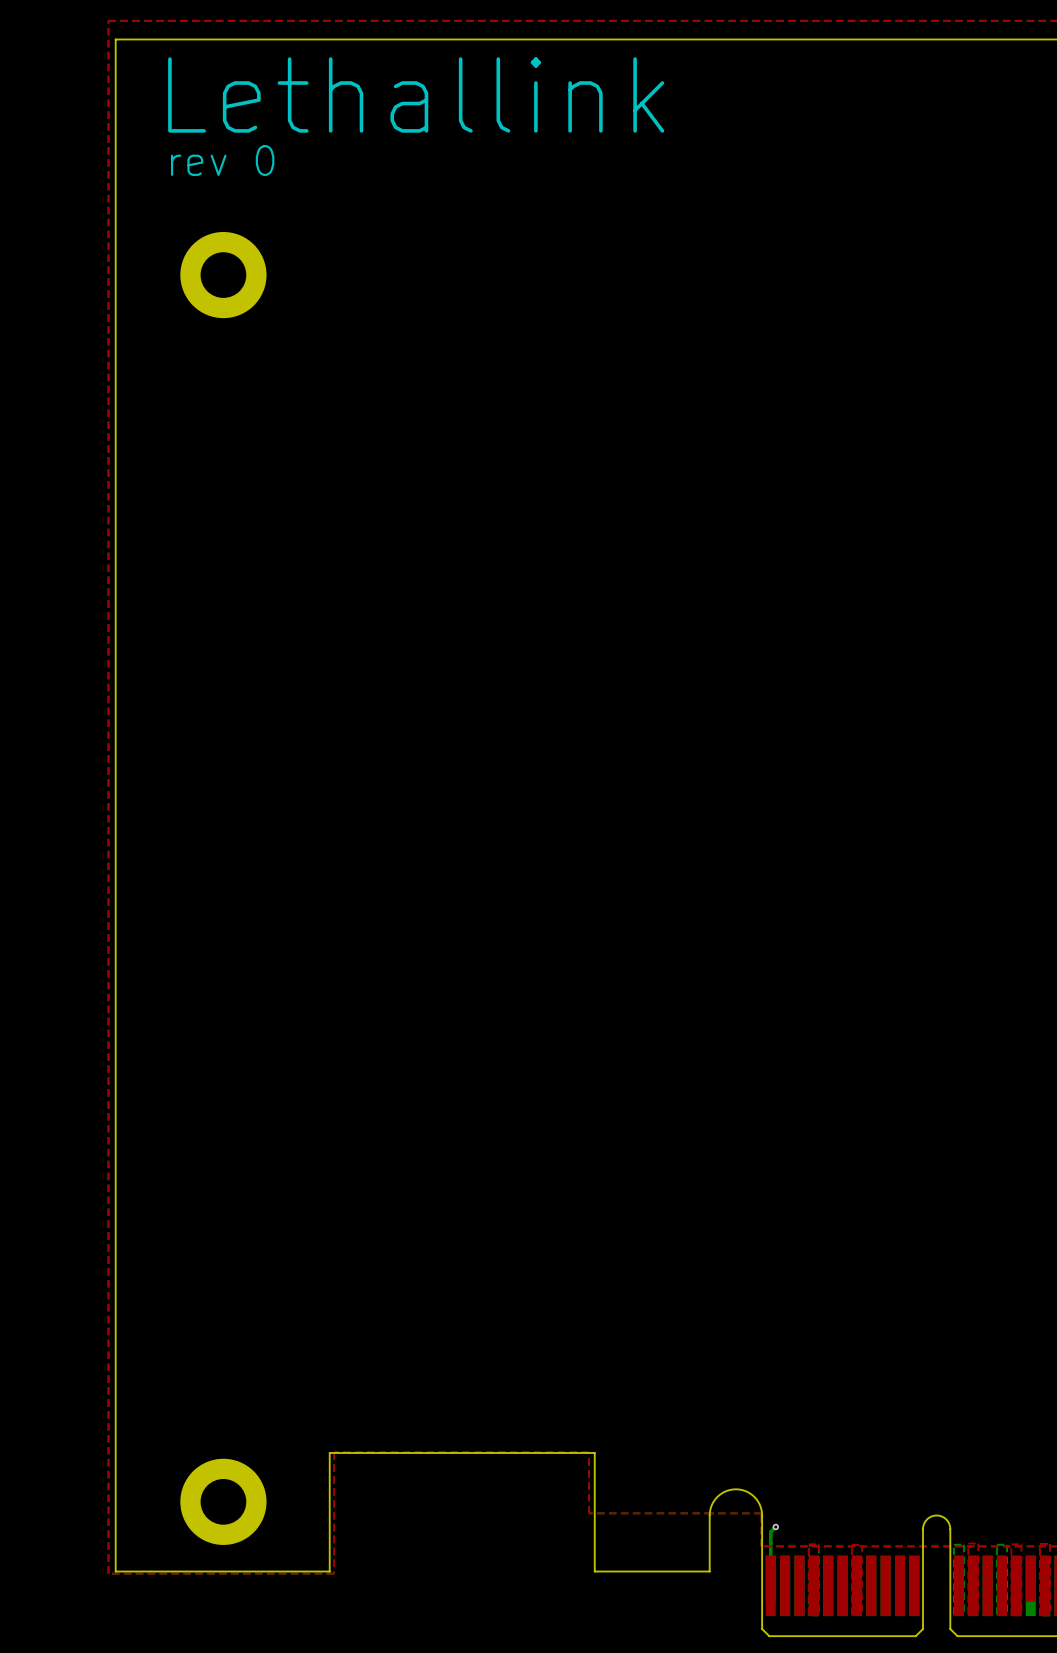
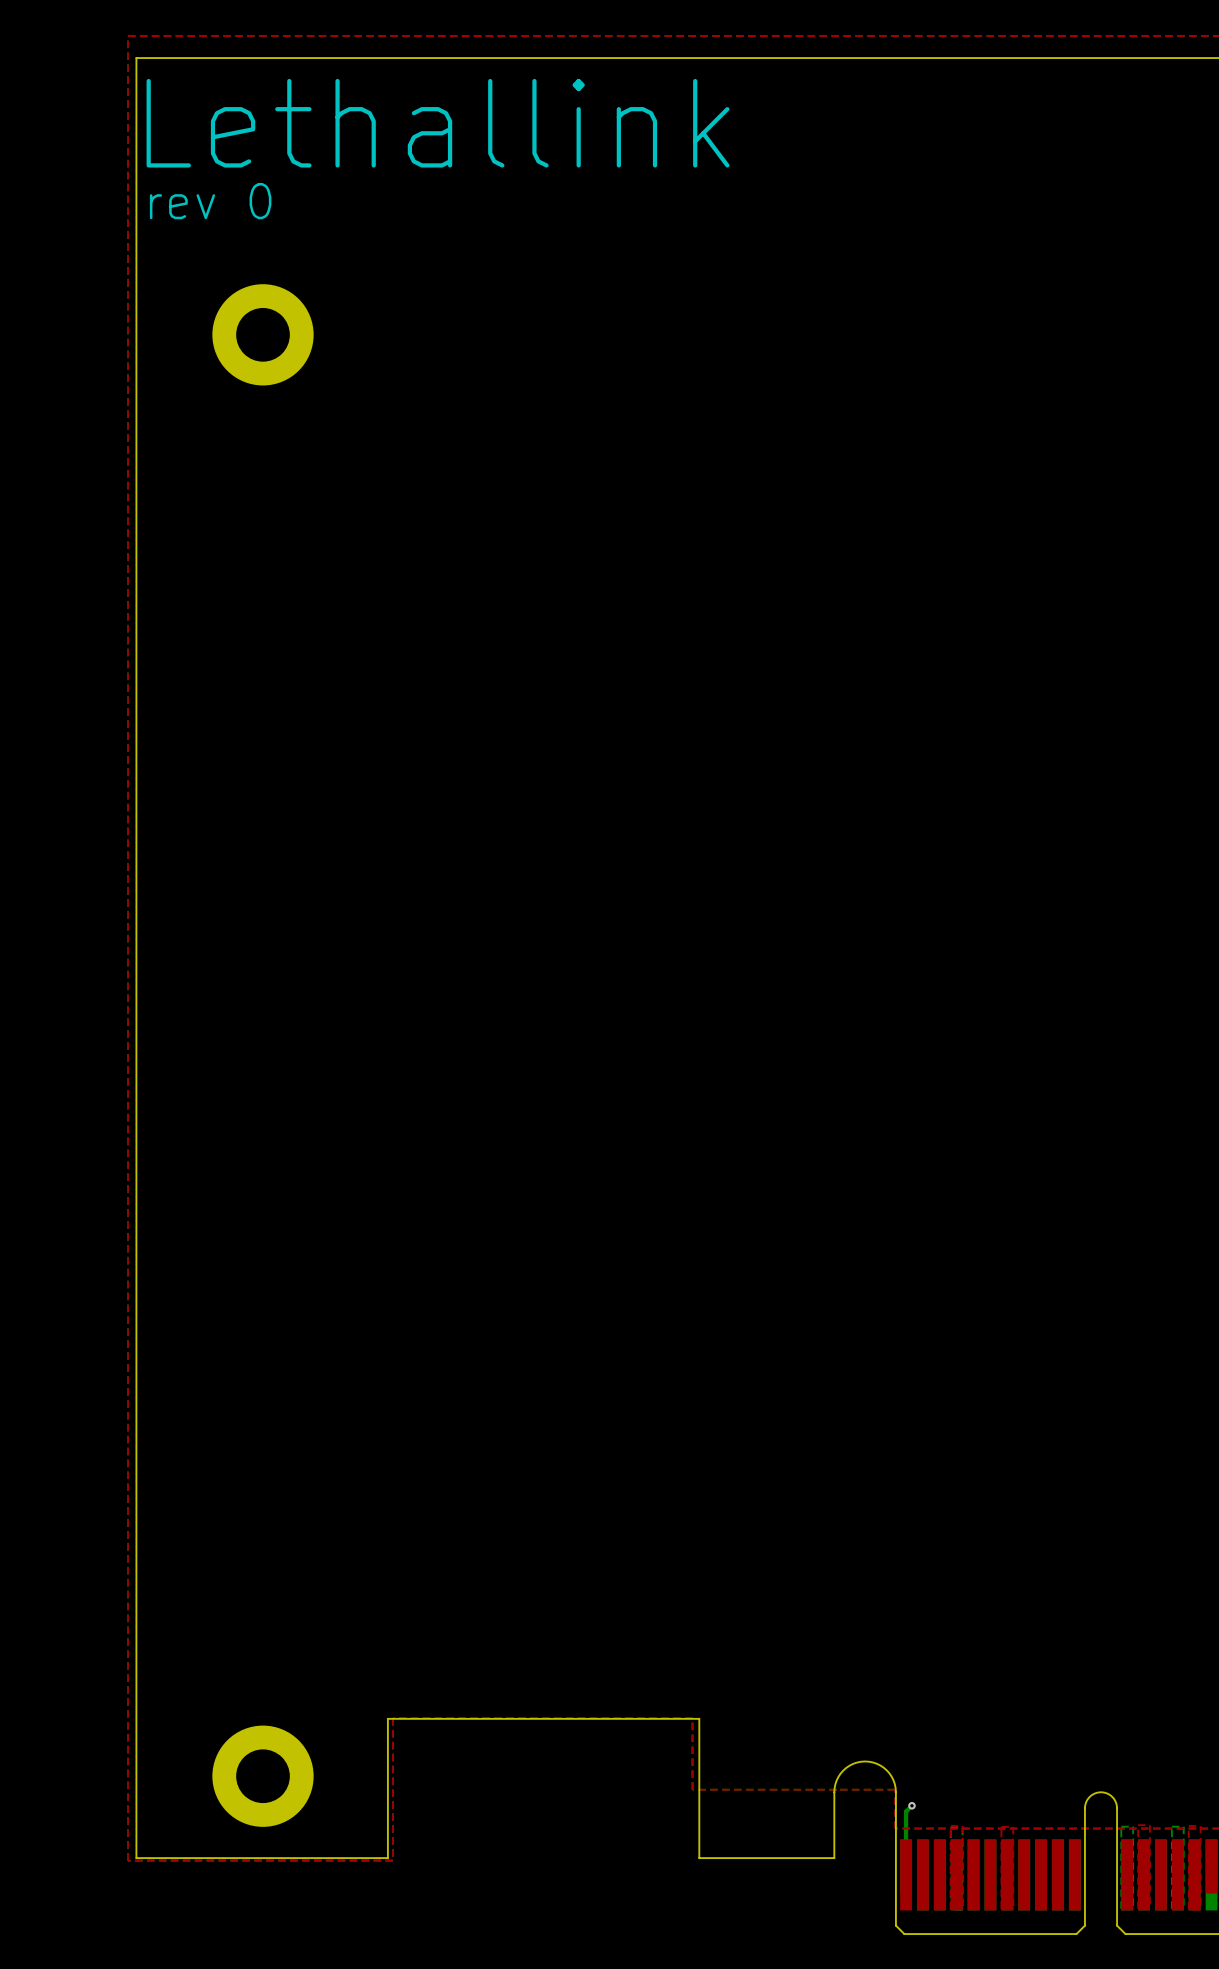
text position: Lethallink (416, 94) -> Lethallink (438, 123)
text position: rev 0 (222, 160) -> rev 0 (210, 201)

